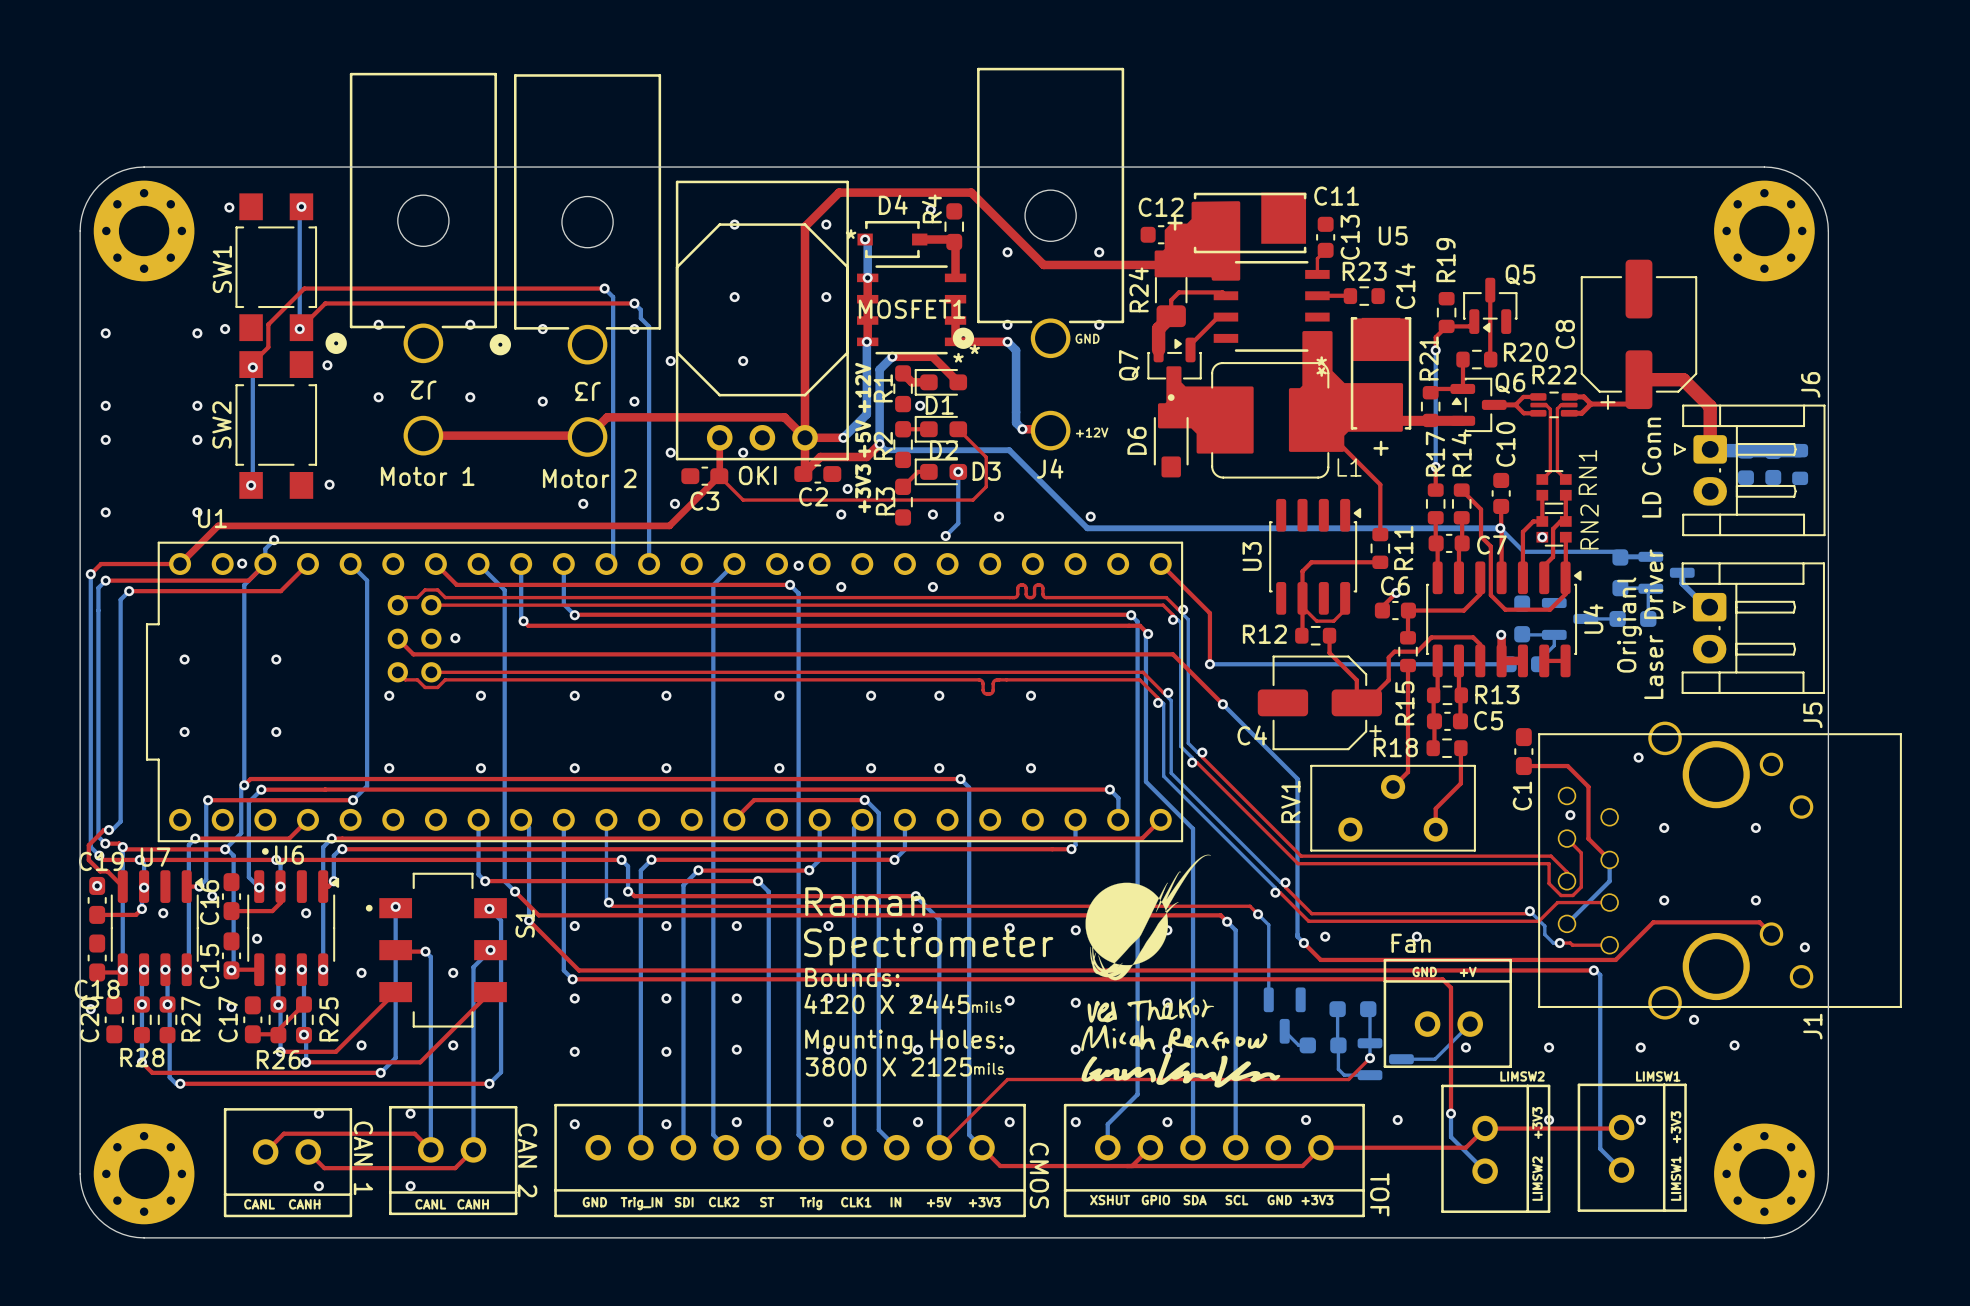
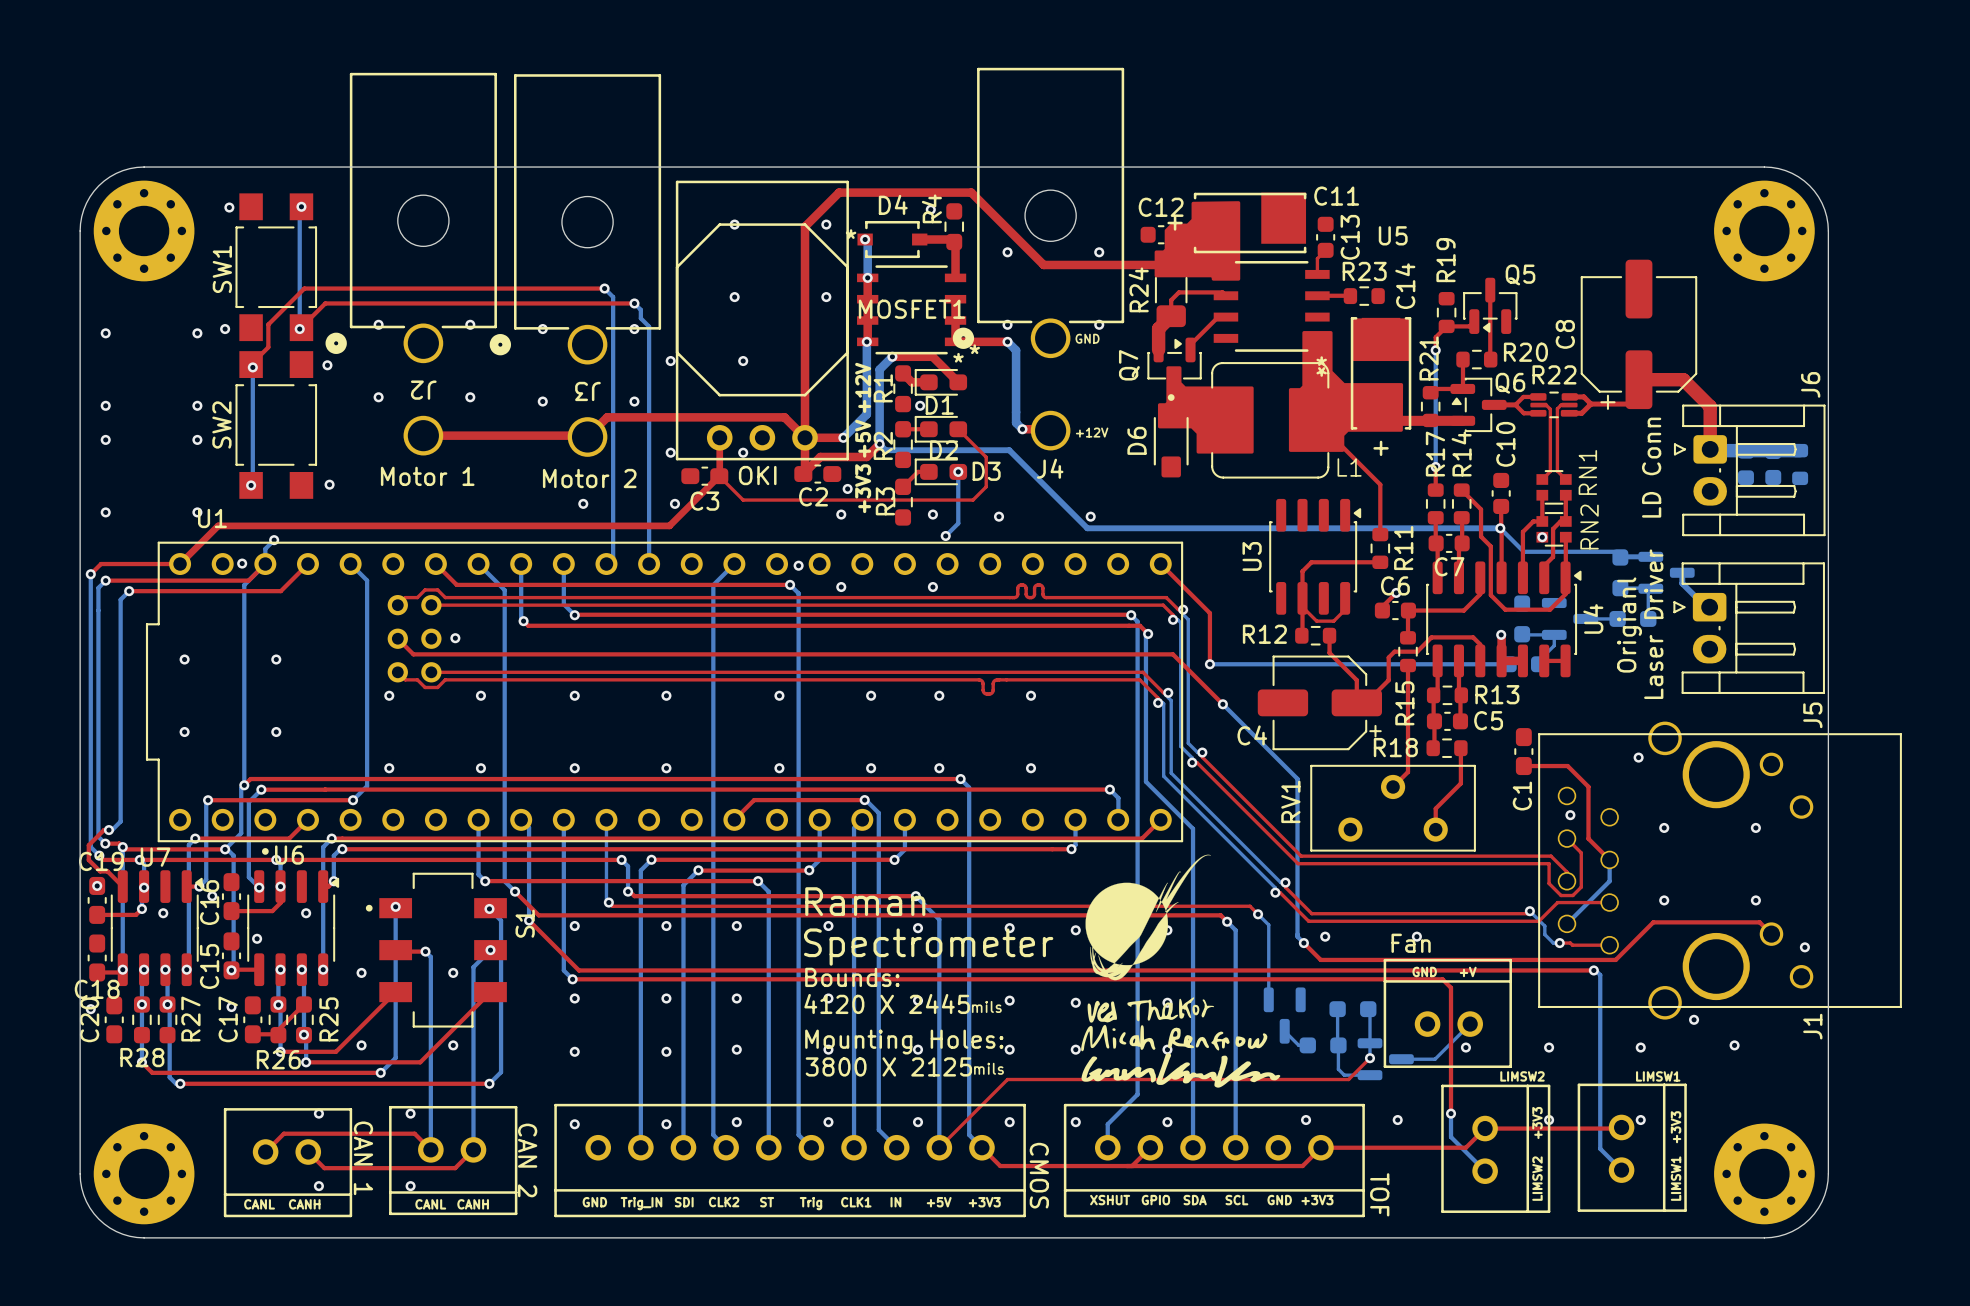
C7 name position: C7 (1491, 545) -> C7 (1449, 566)

